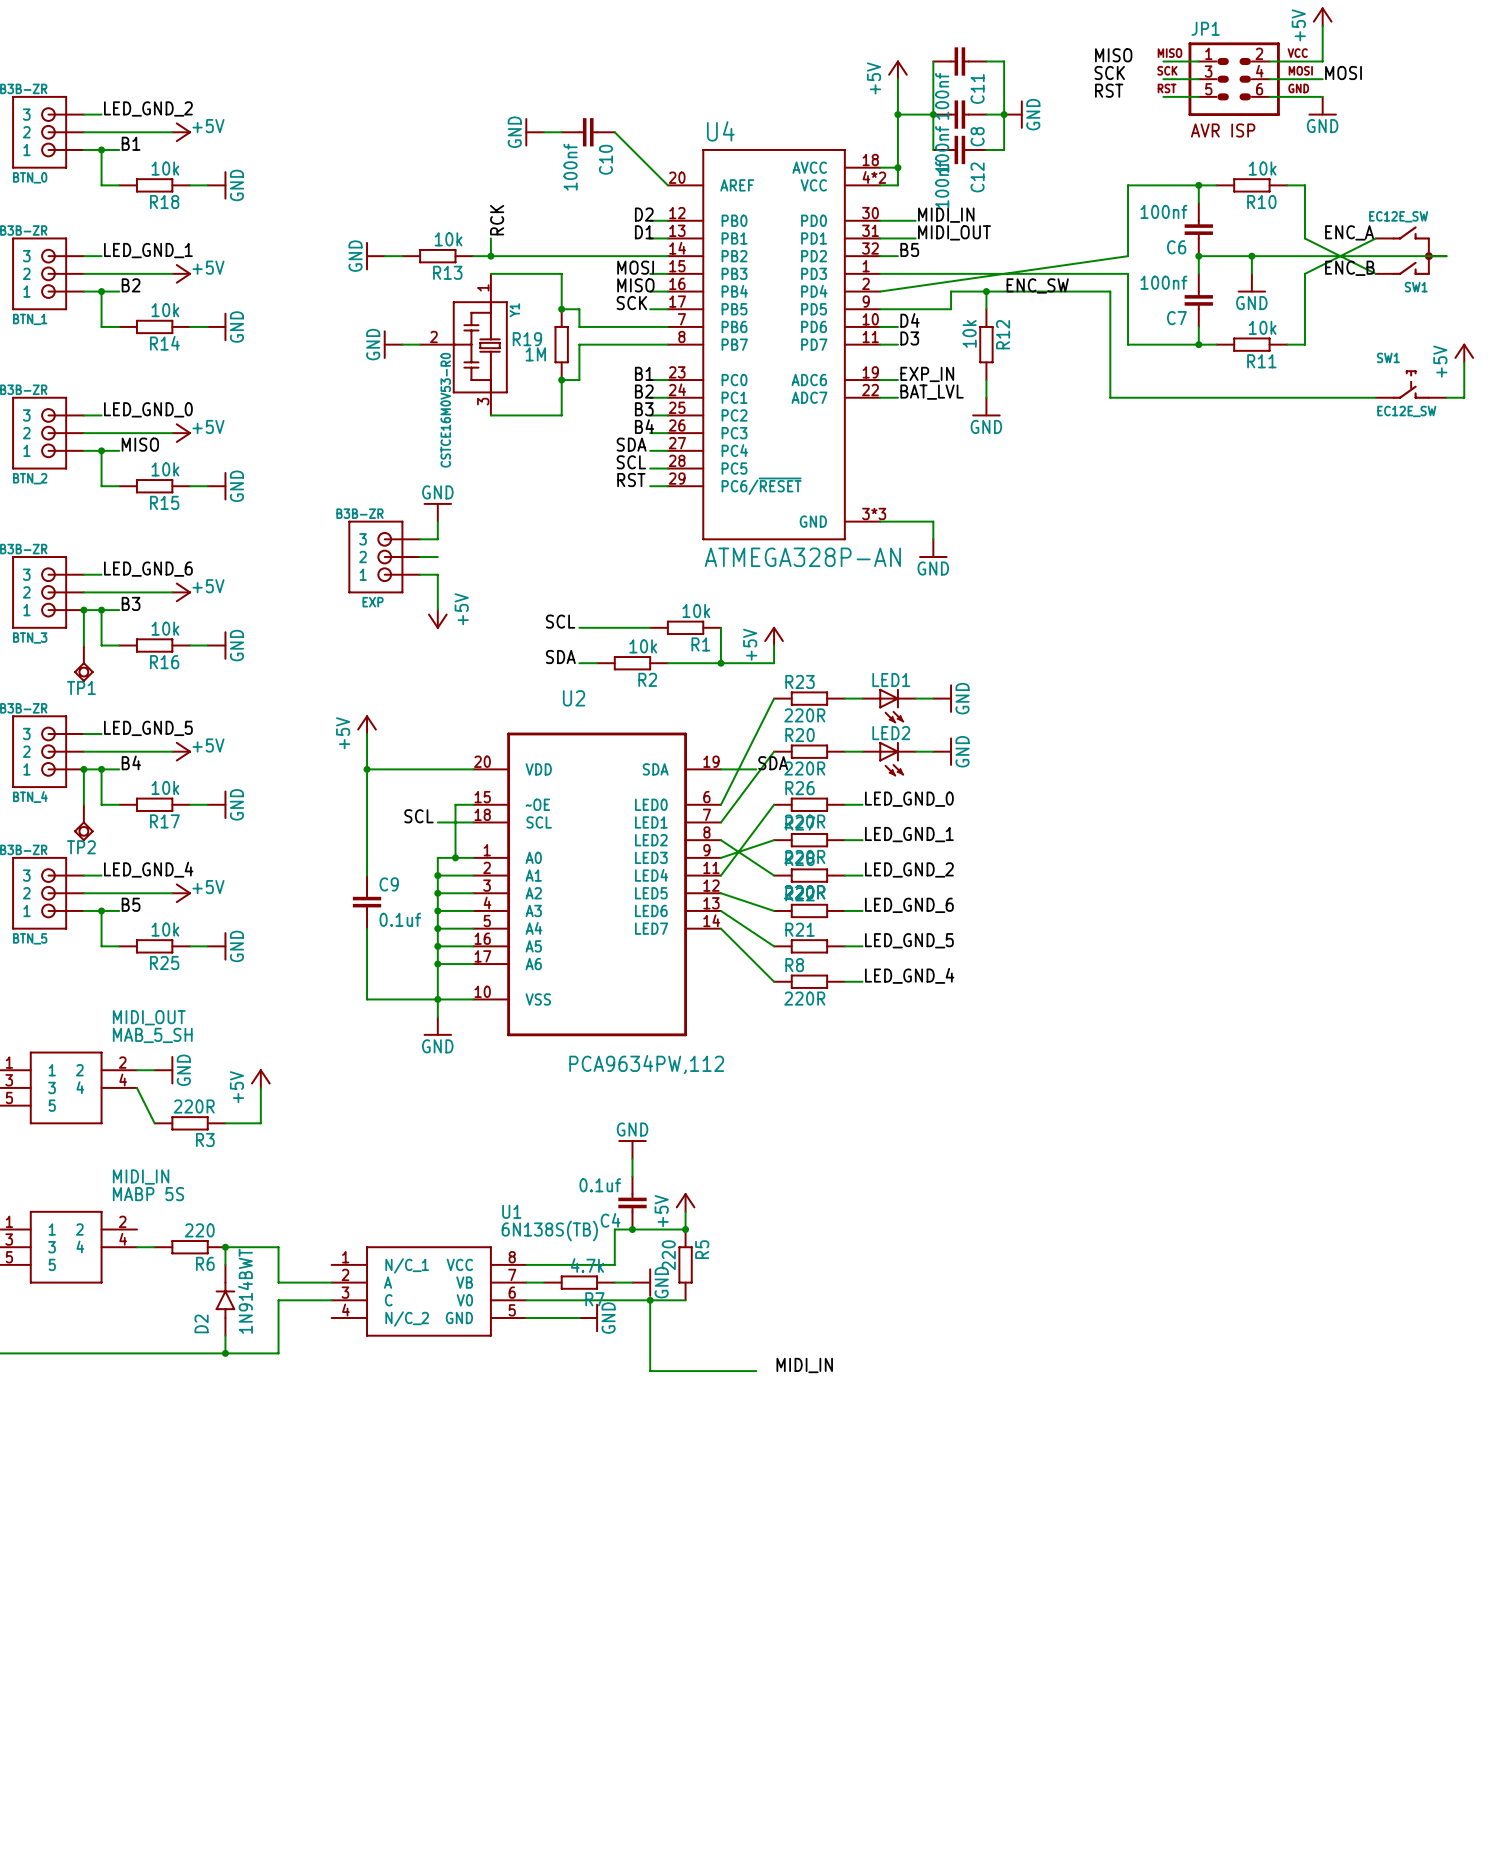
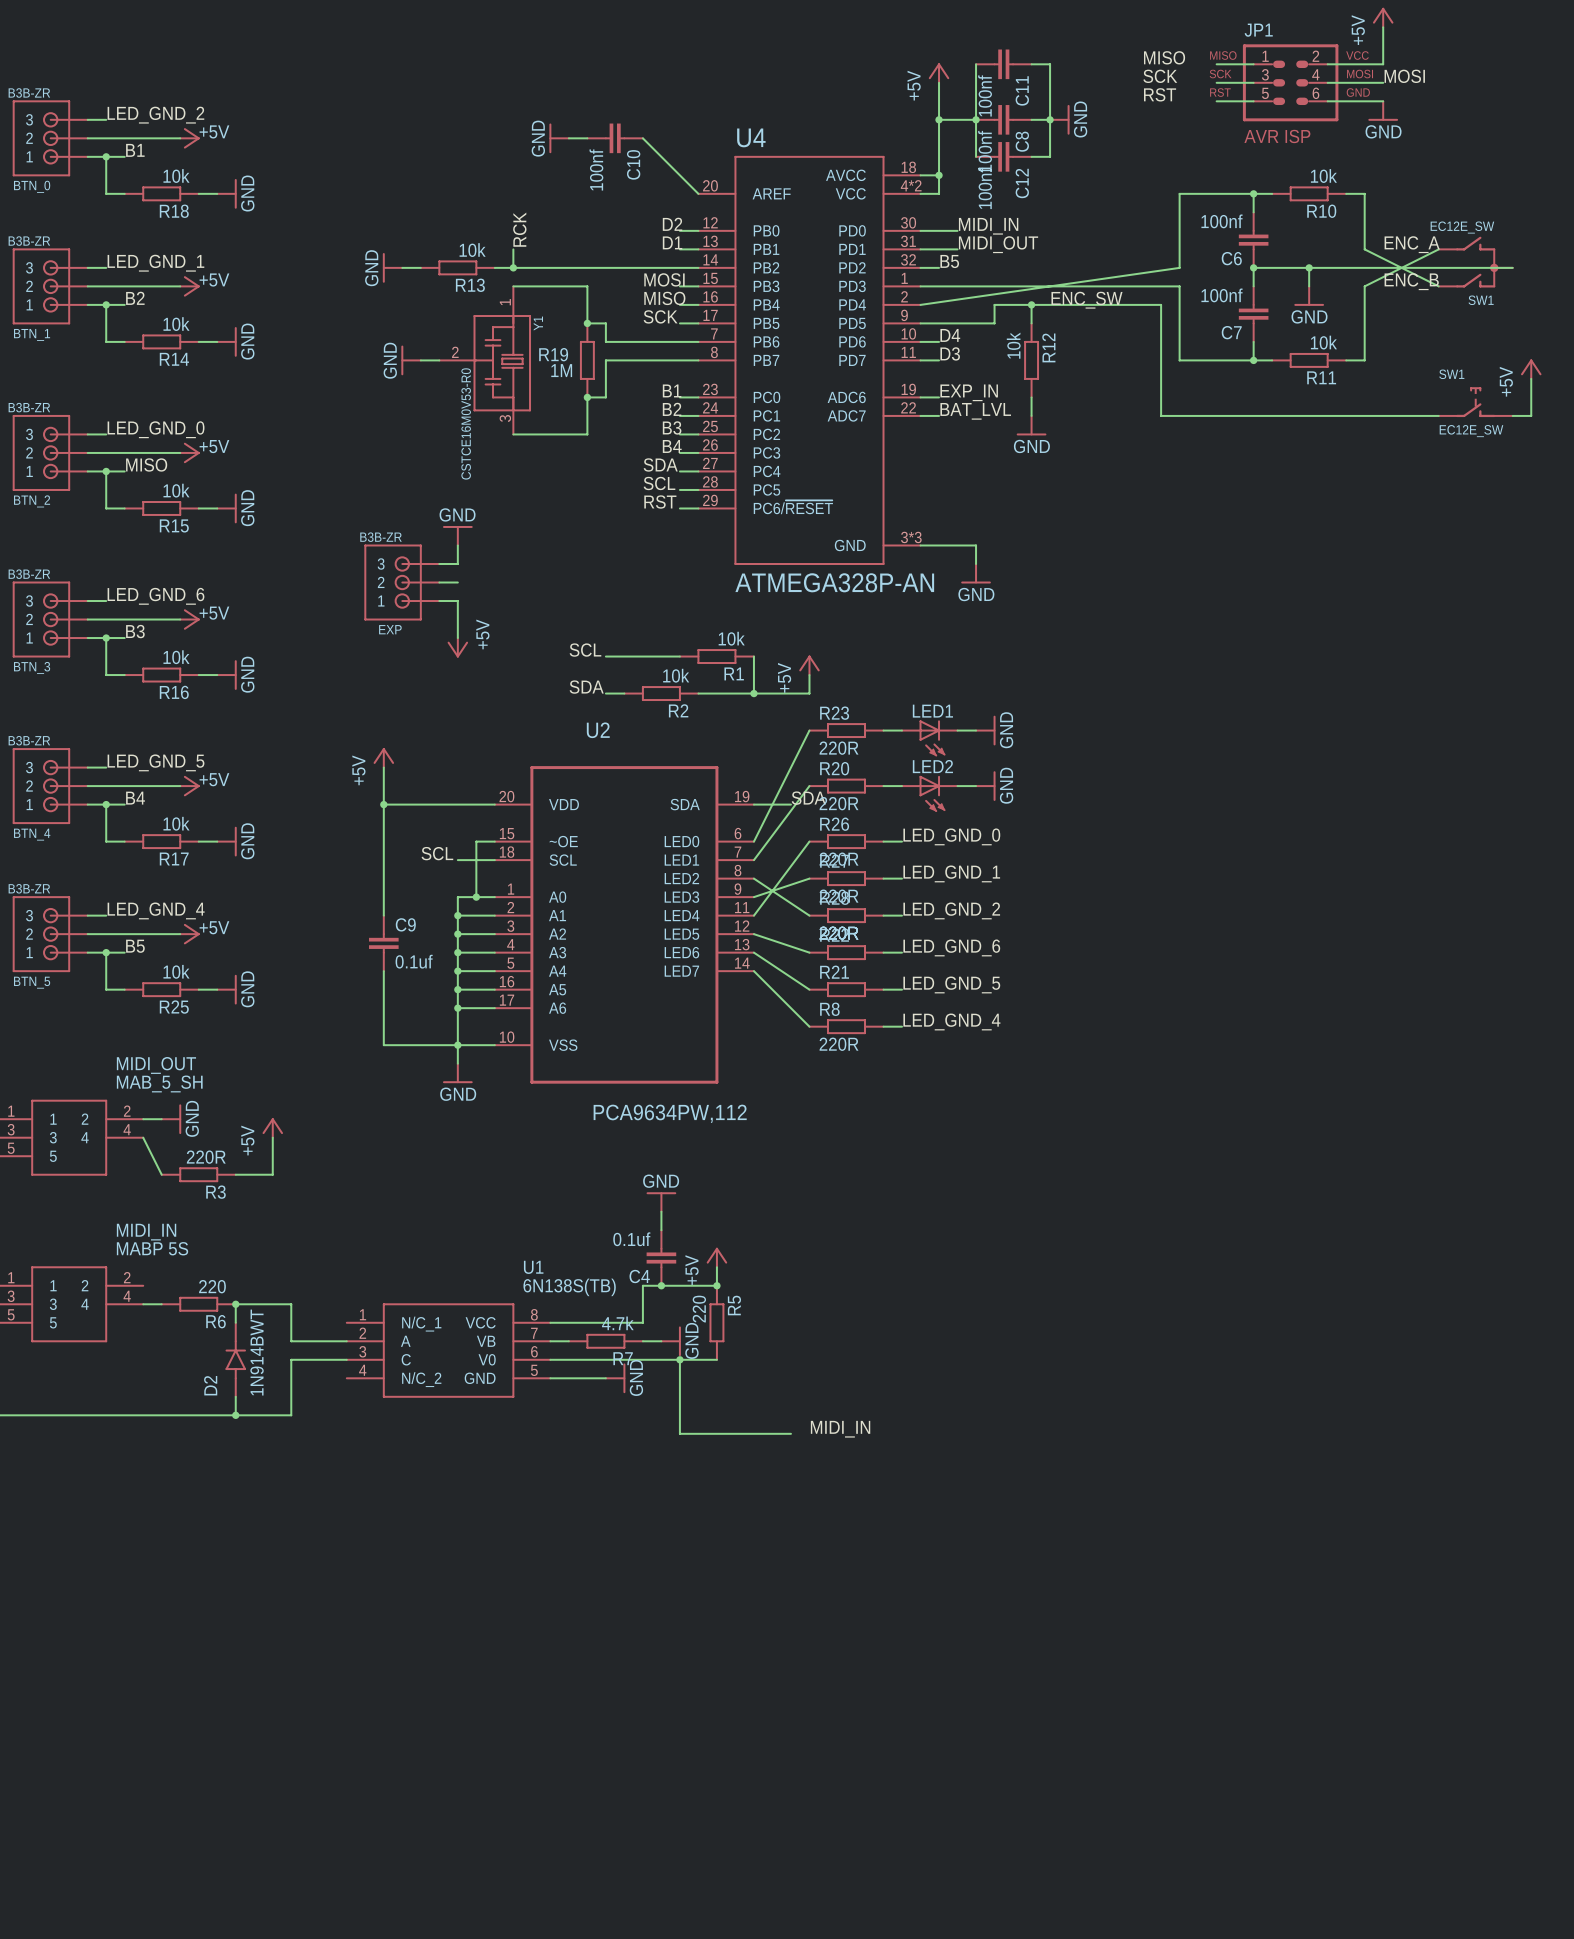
wire: (83, 610) (83, 645) -> none
junction: (83, 610) -> none
TP1: (83, 663) -> none
wire: (83, 769) (83, 804) -> none
junction: (83, 769) -> none
TP2: (83, 822) -> none

